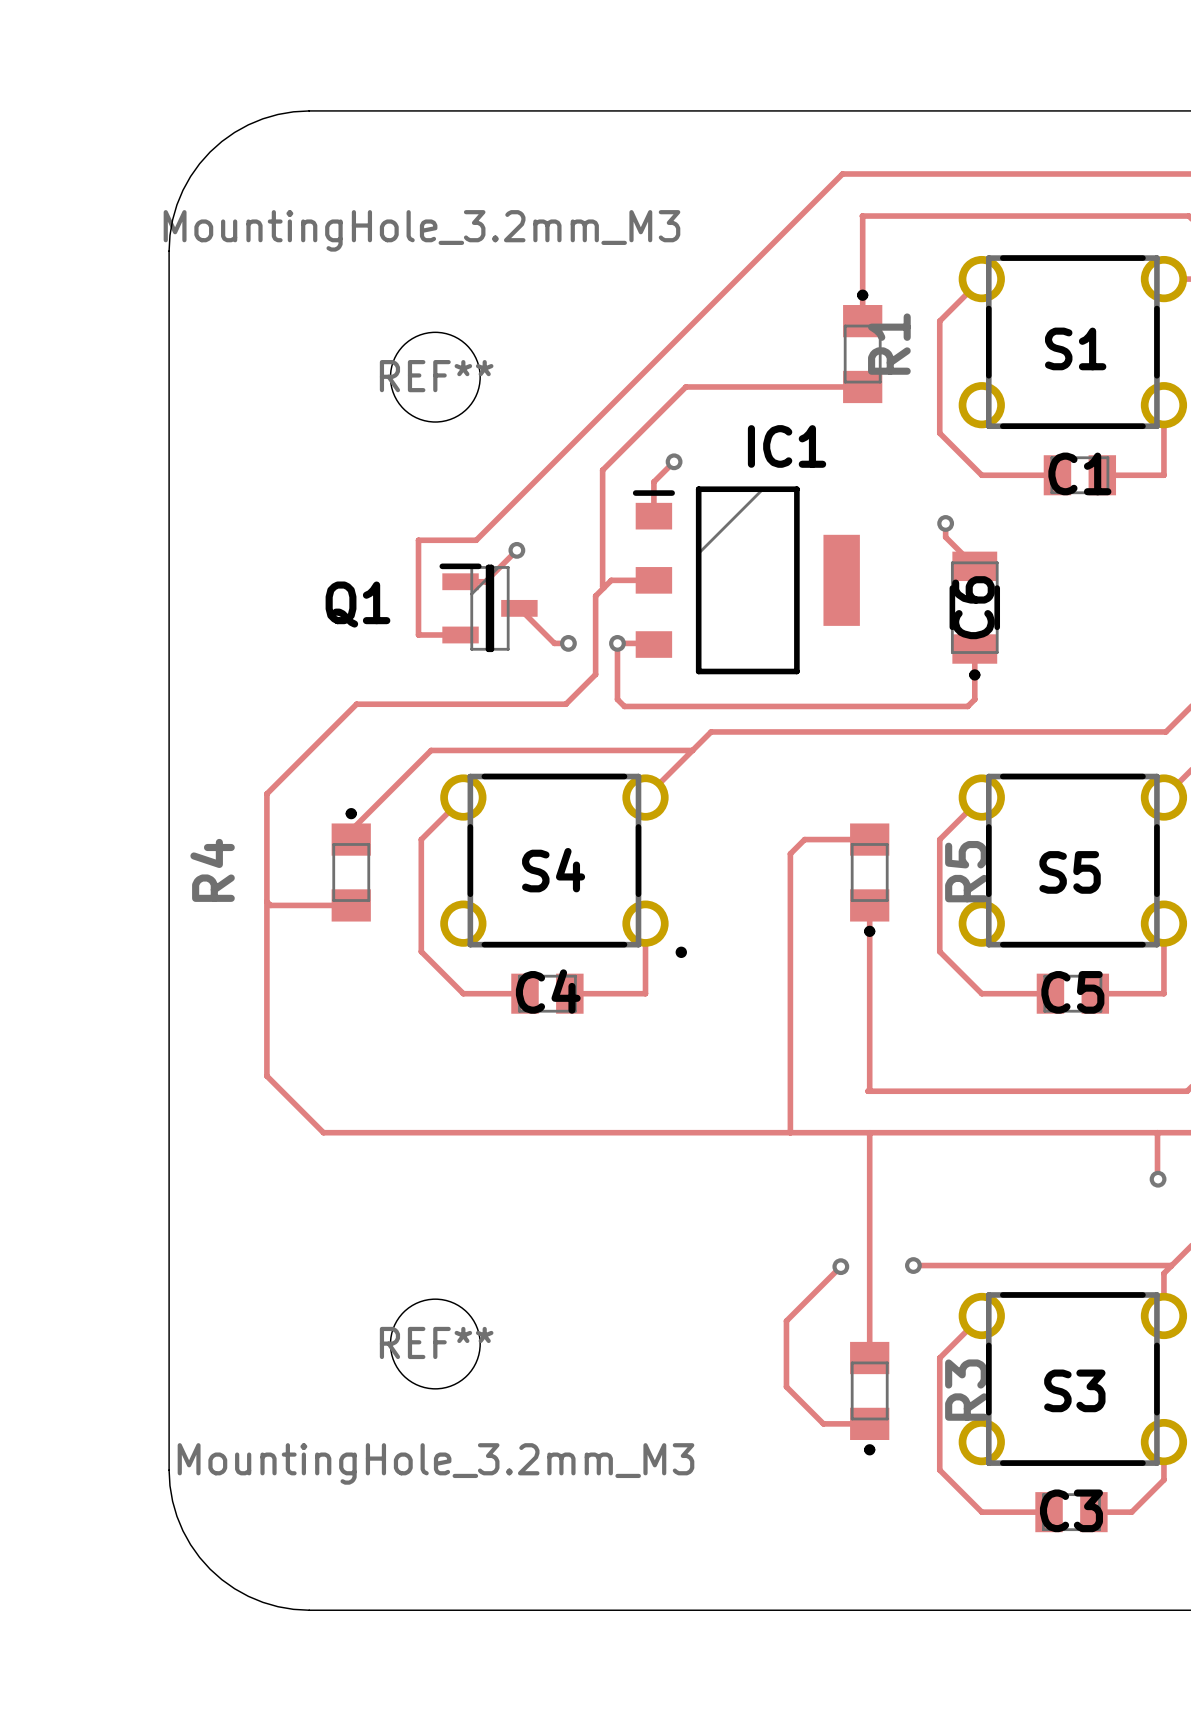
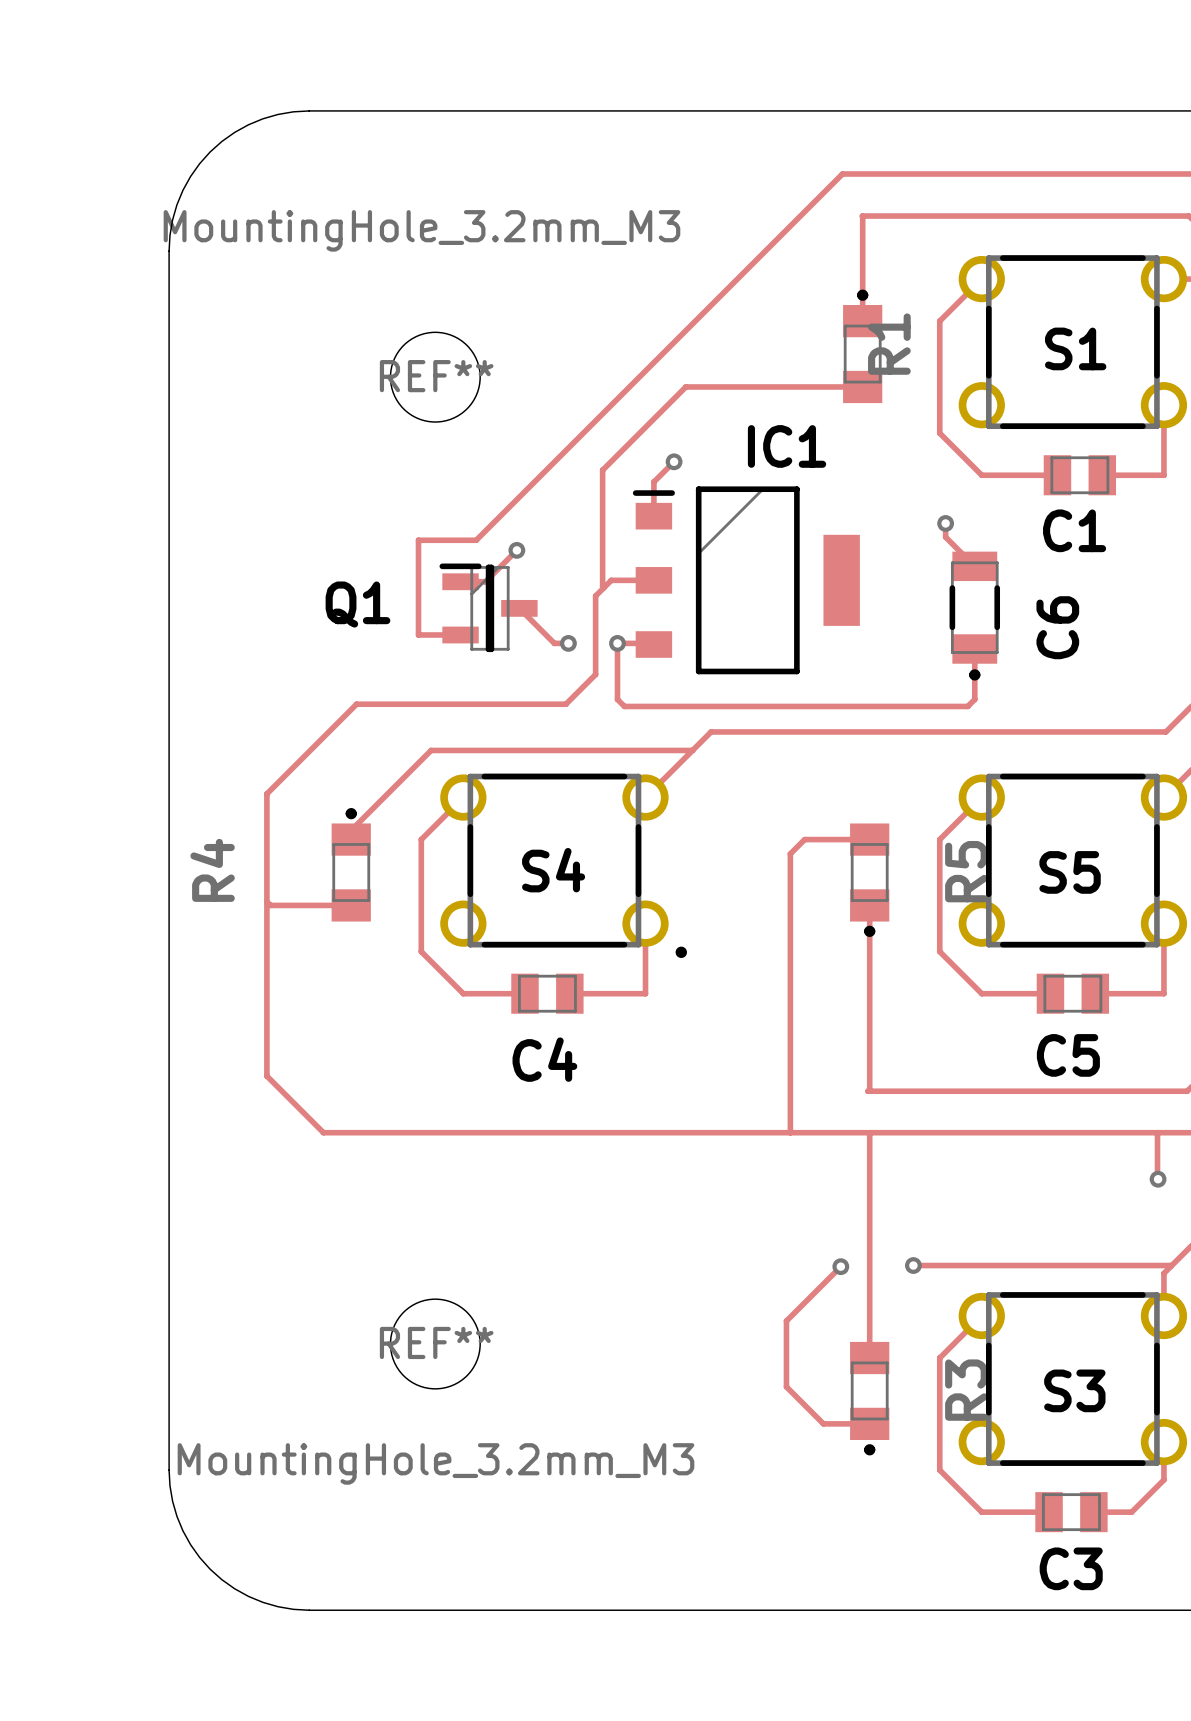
C1 name position: C1 (1079, 473) -> C1 (1074, 530)
C6 name position: C6 (973, 607) -> C6 (1057, 627)
C4 name position: C4 (548, 991) -> C4 (544, 1059)
C5 name position: C5 (1072, 992) -> C5 (1068, 1055)
C3 name position: C3 (1071, 1510) -> C3 (1071, 1568)

